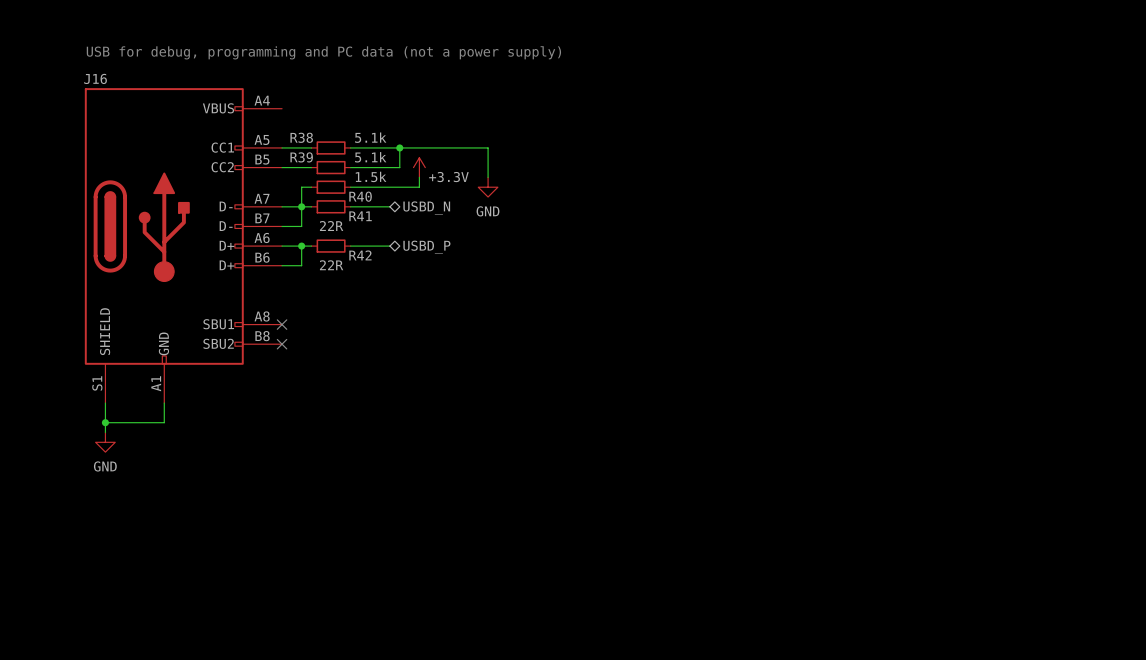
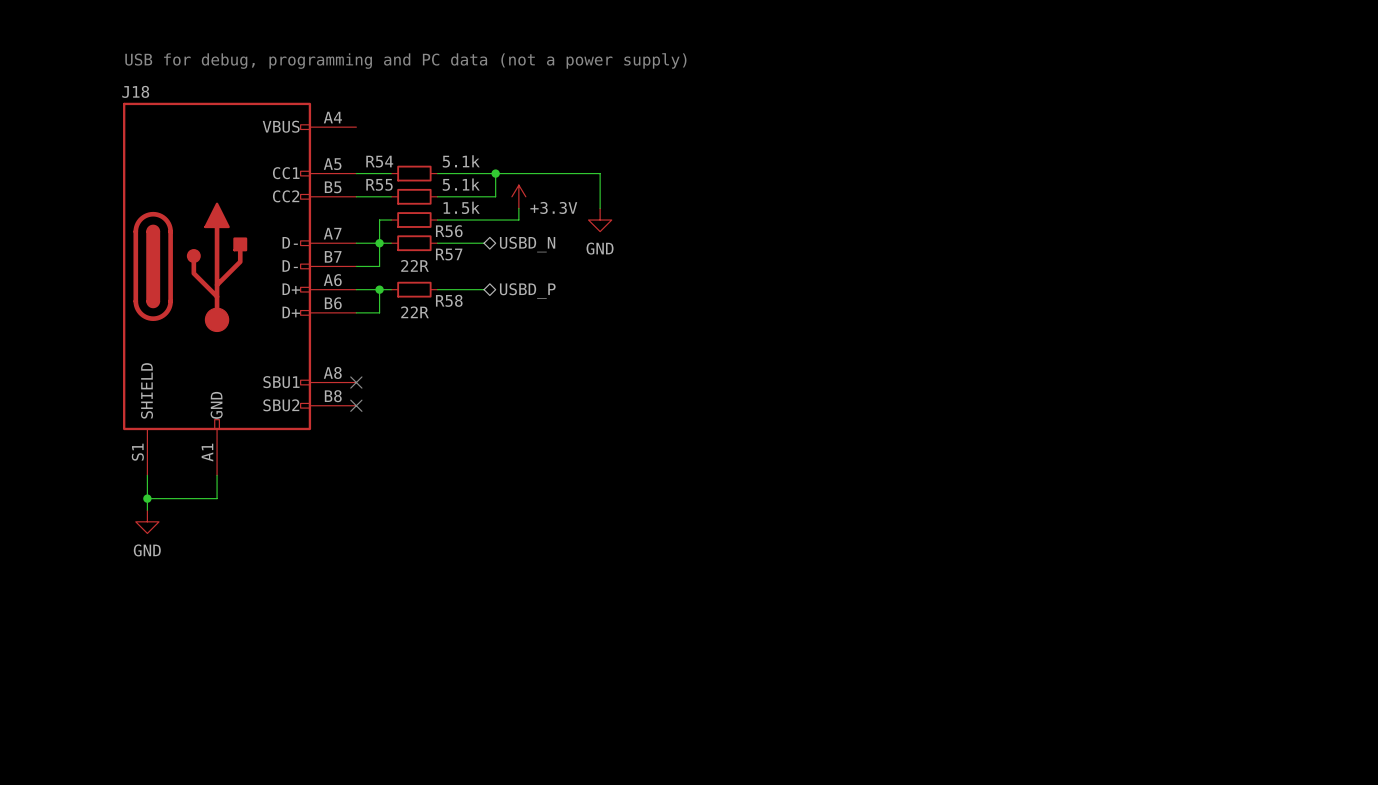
J16 name: J16 (95, 78) -> J18 (135, 91)
R38 name: R38 (301, 137) -> R54 (379, 161)
R39 name: R39 (301, 157) -> R55 (379, 184)
R40 name: R40 (360, 196) -> R56 (449, 231)
R41 name: R41 (360, 216) -> R57 (449, 254)
R42 name: R42 (360, 255) -> R58 (449, 300)

